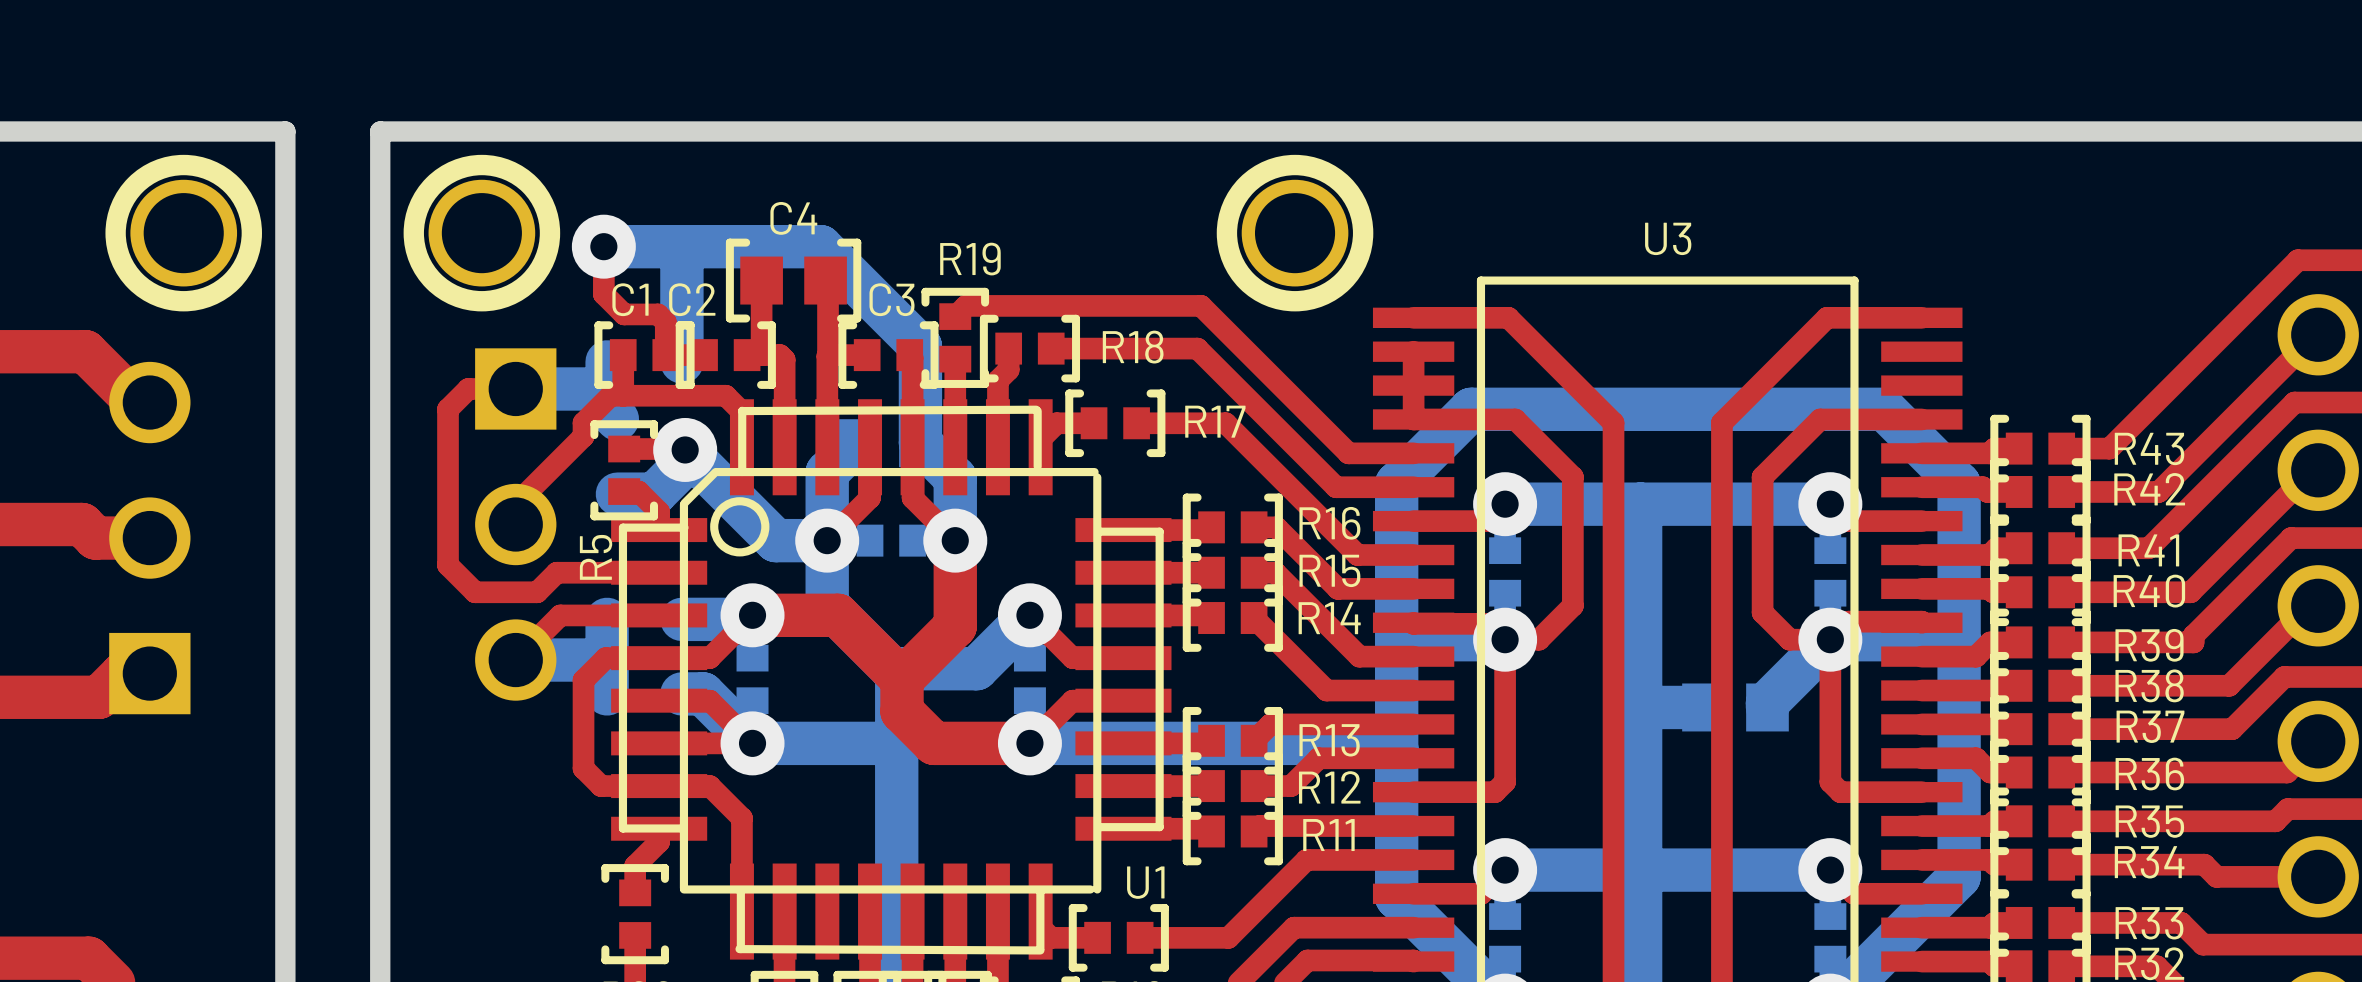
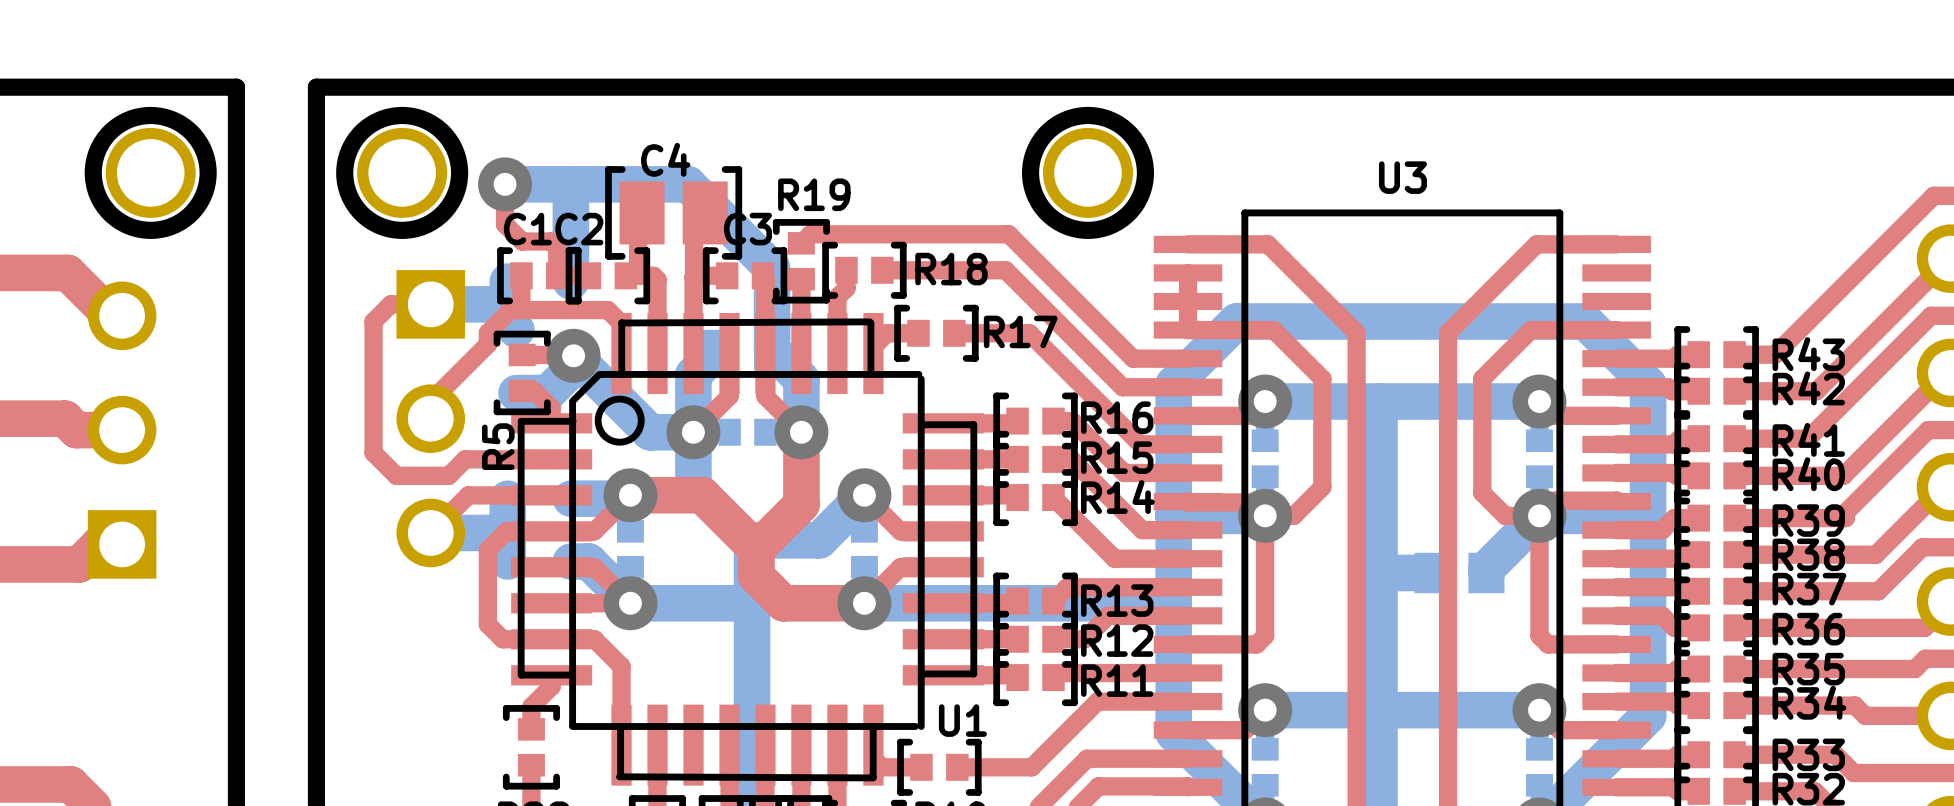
C4 footprint: [725, 238, 862, 323] -> [605, 166, 743, 260]

